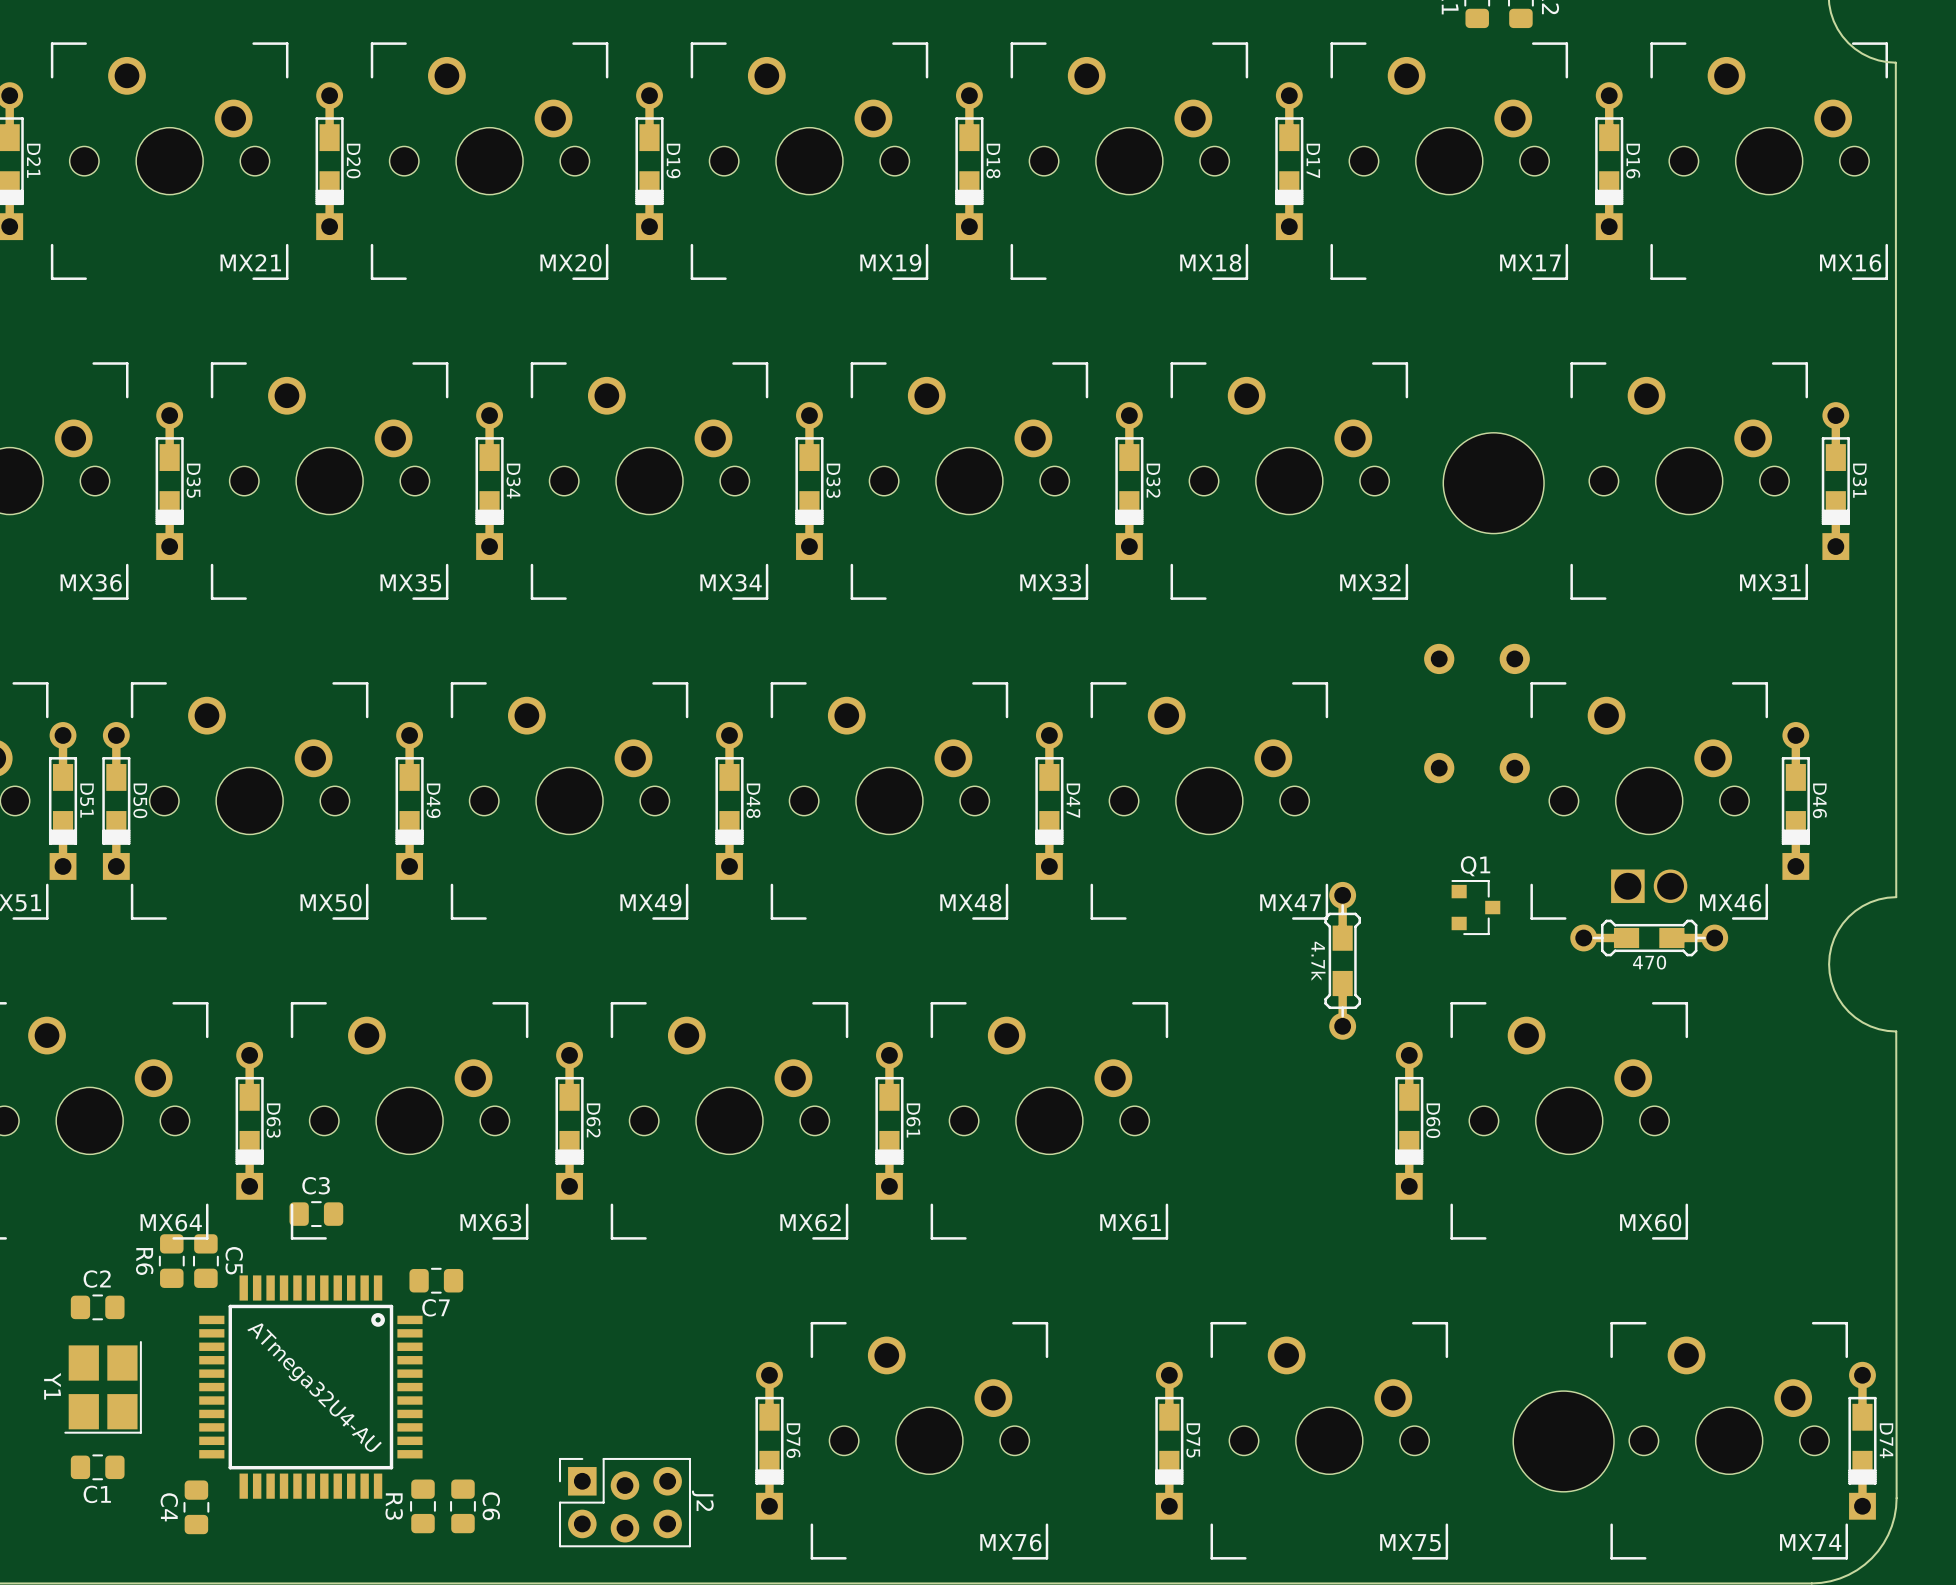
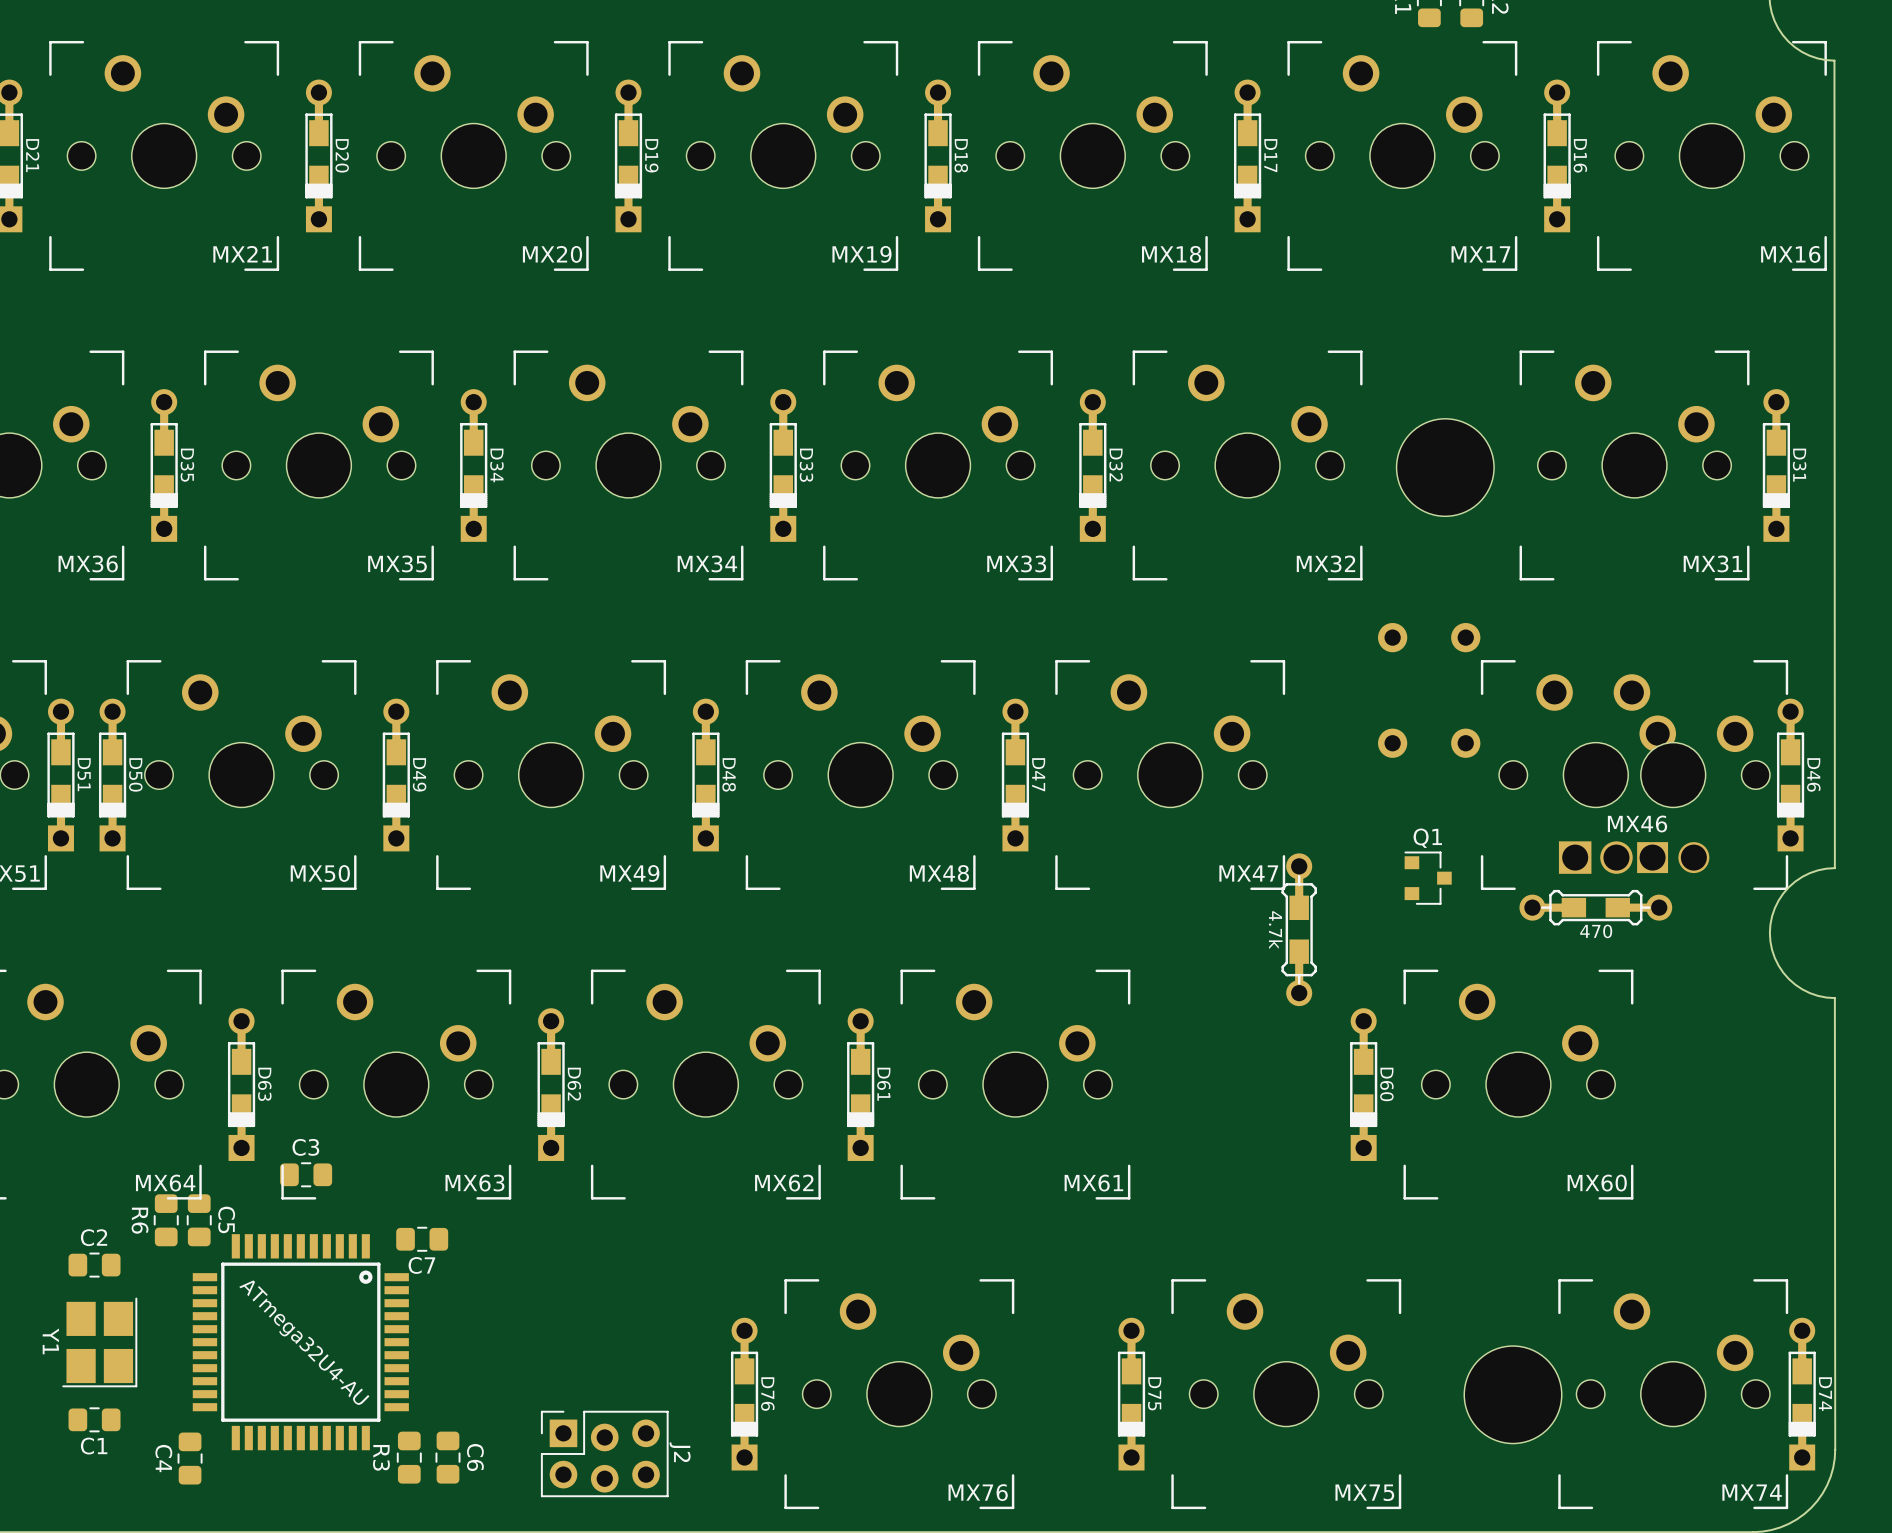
MX46 footprint: [1530, 682, 1769, 920] -> [1480, 660, 1789, 891]
D46 position: (1795, 800) -> (1790, 775)
MX46 name position: MX46 (1730, 902) -> MX46 (1637, 823)

